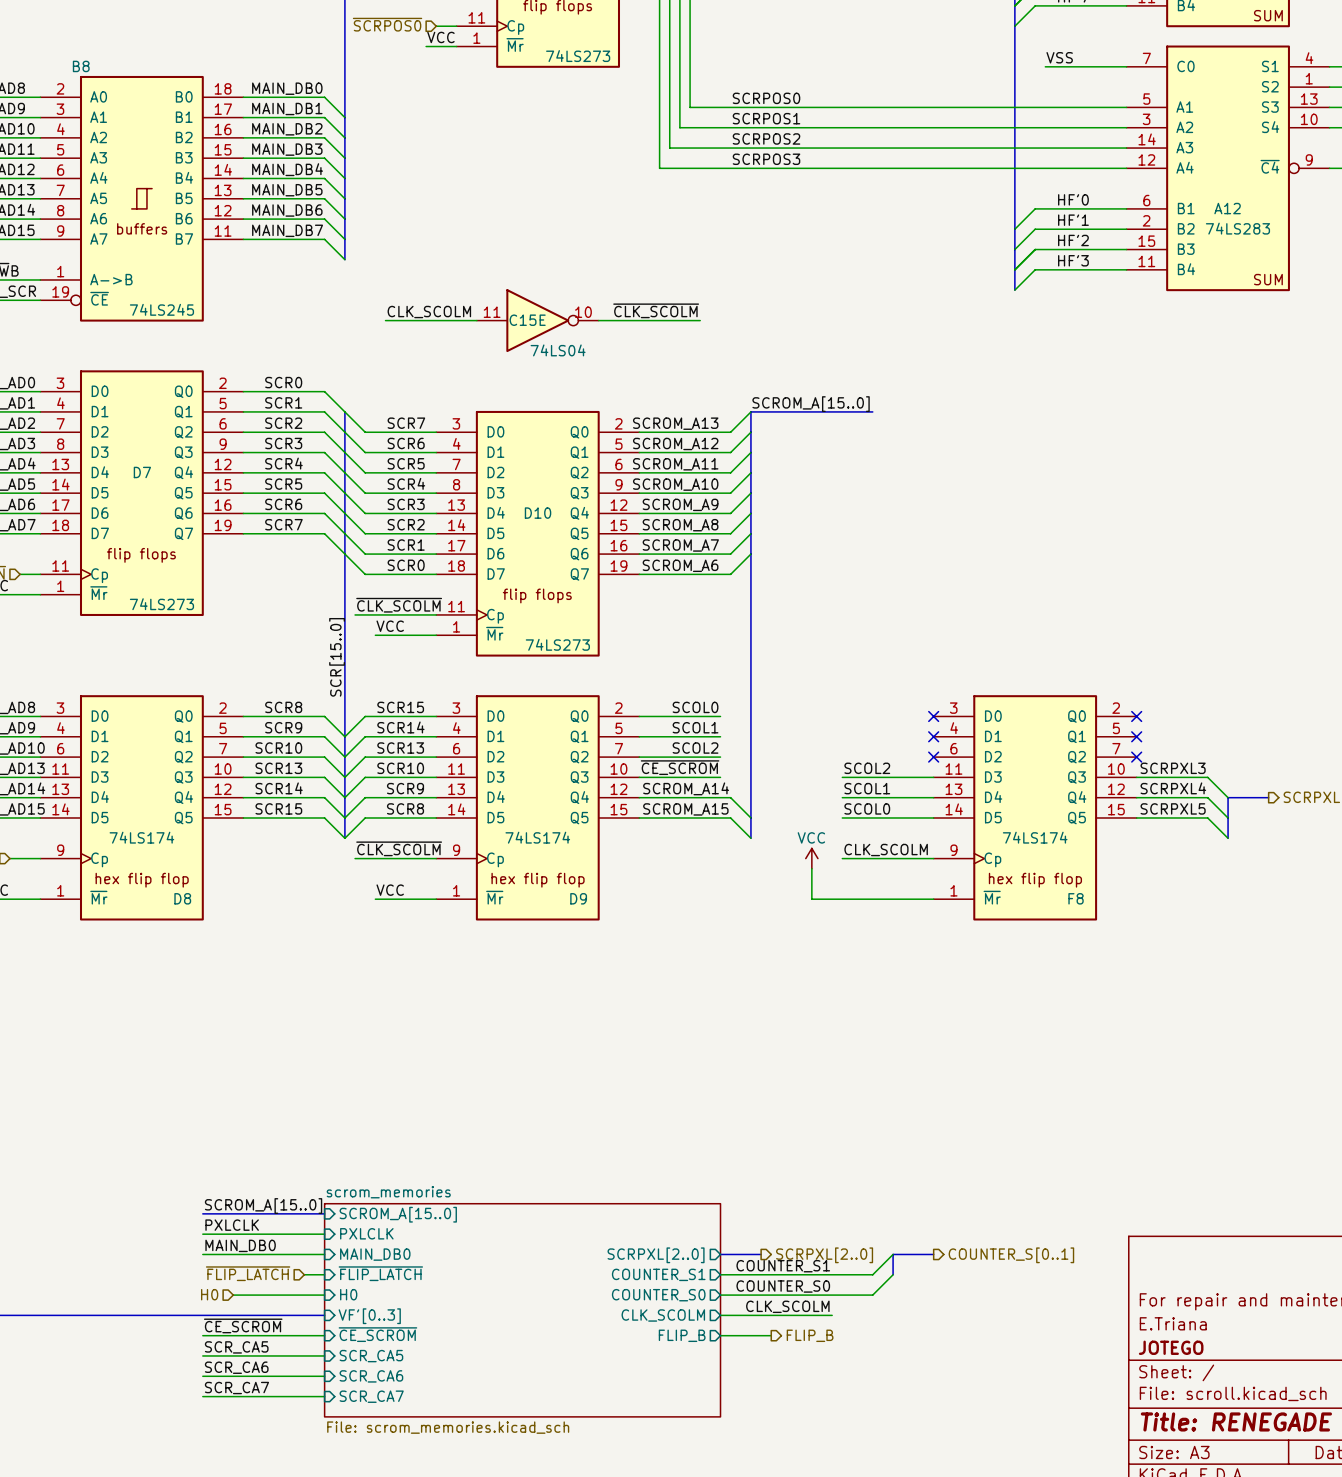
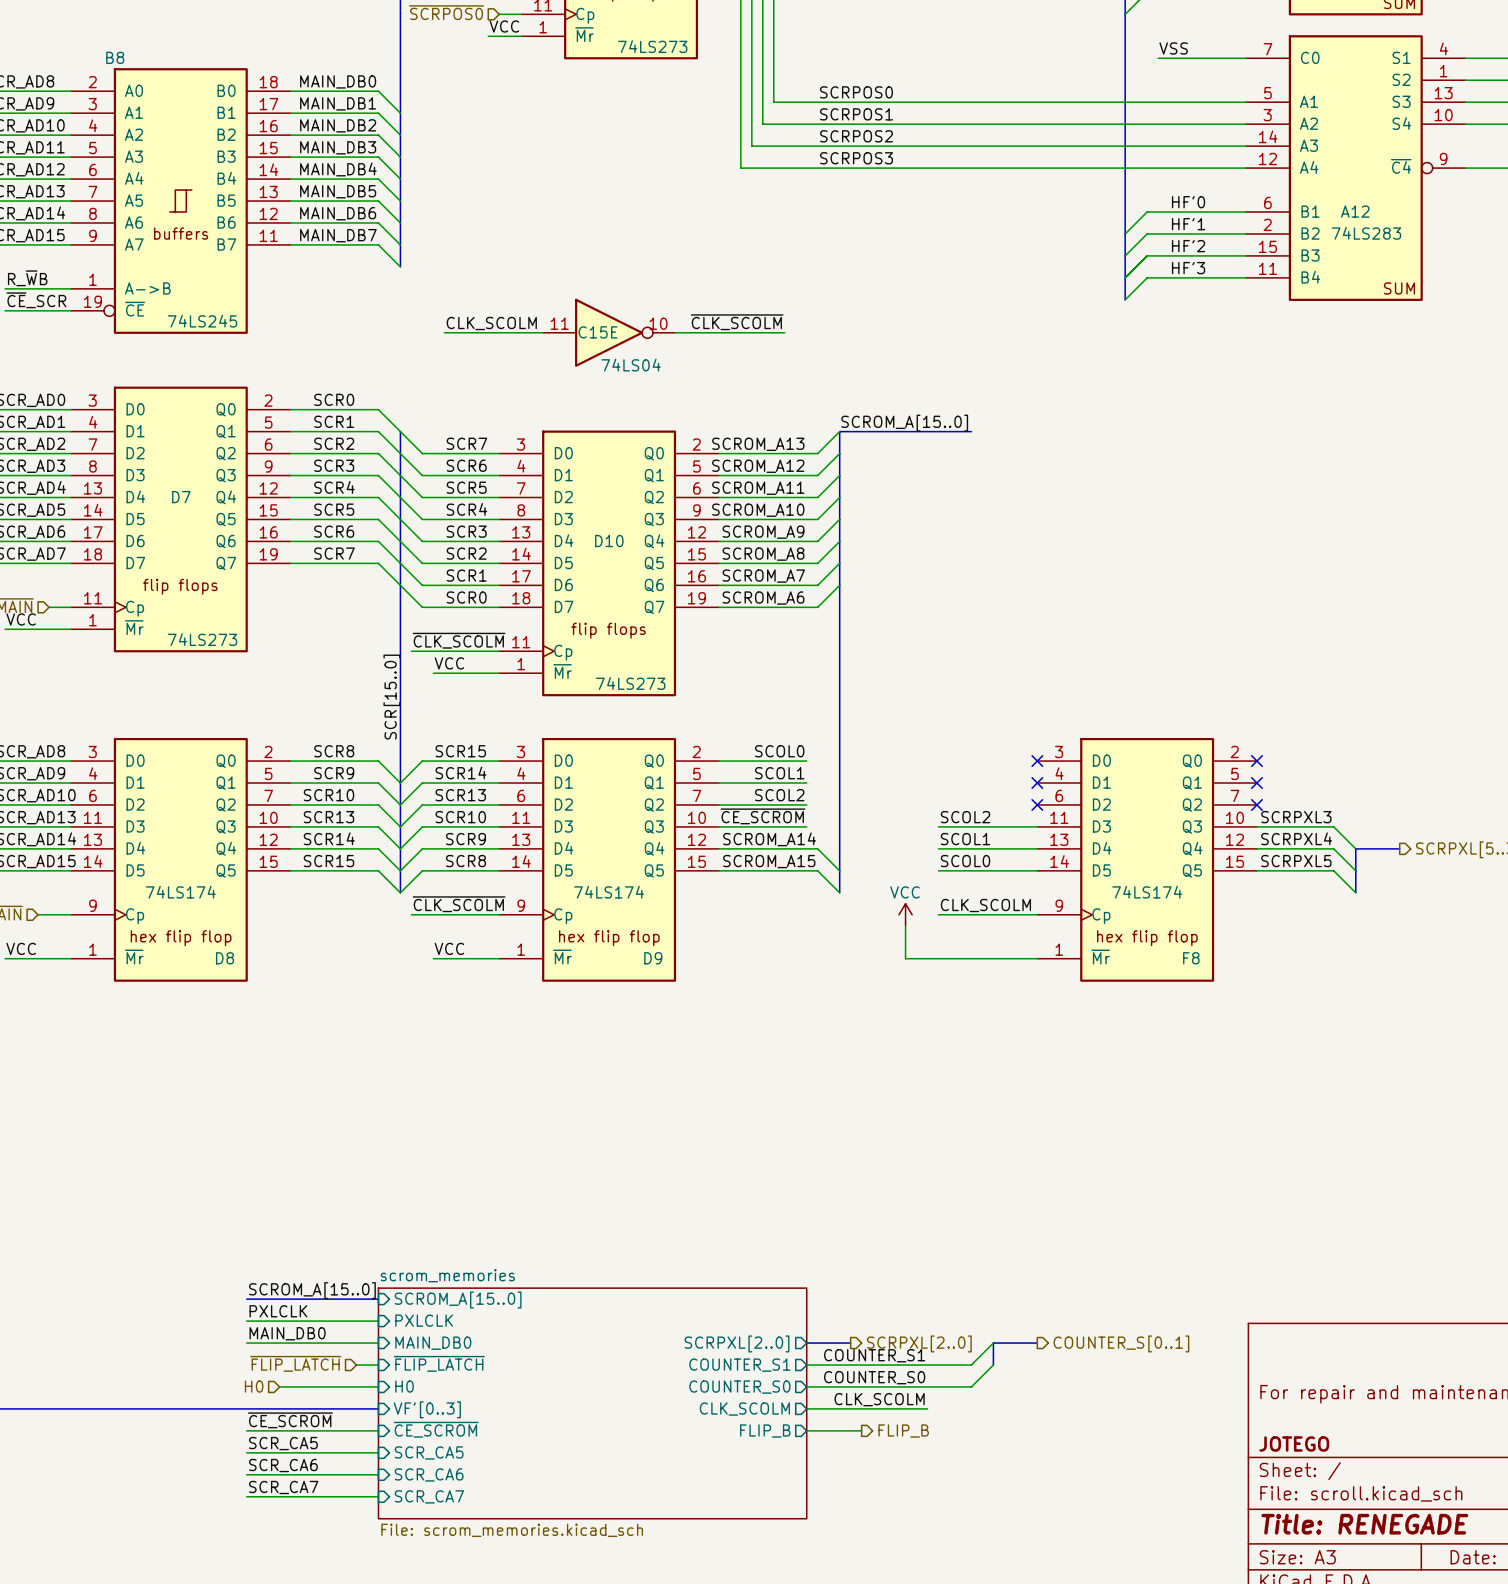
title block: E.Triana (1173, 1323) -> none

